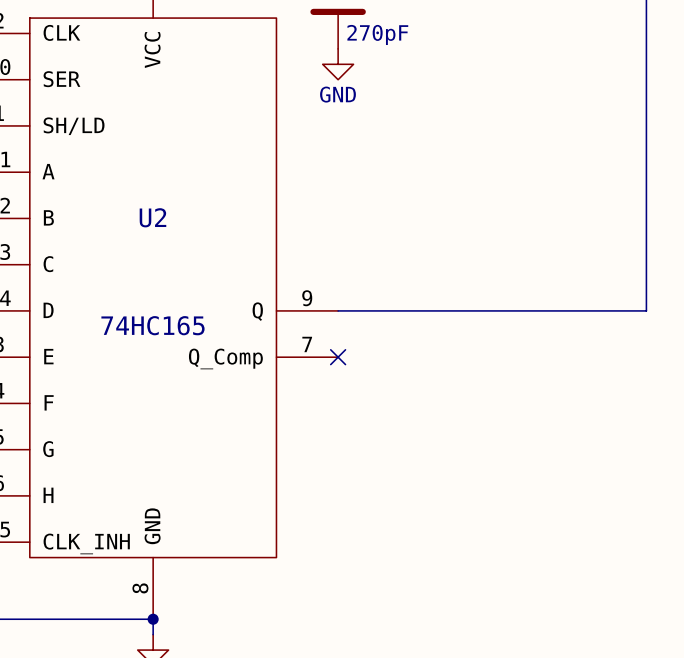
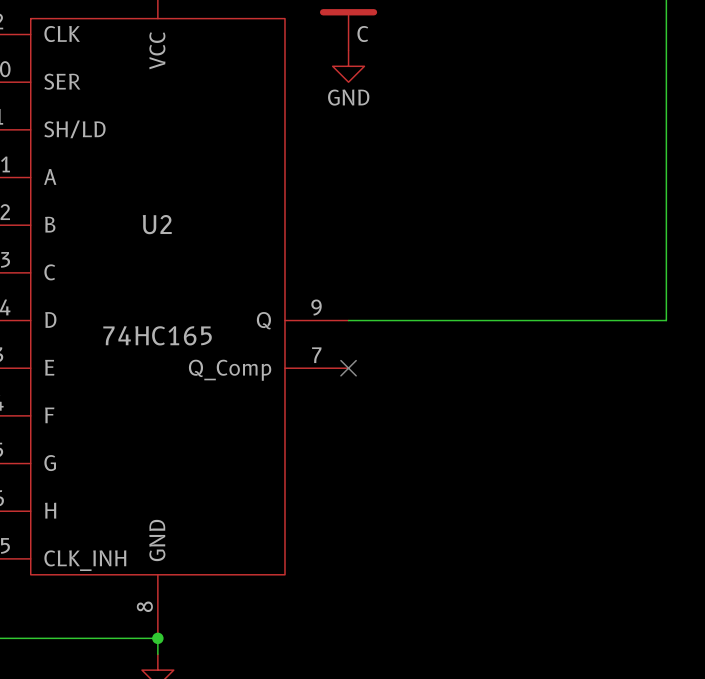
part value: 270pF (377, 34) -> C (362, 34)

